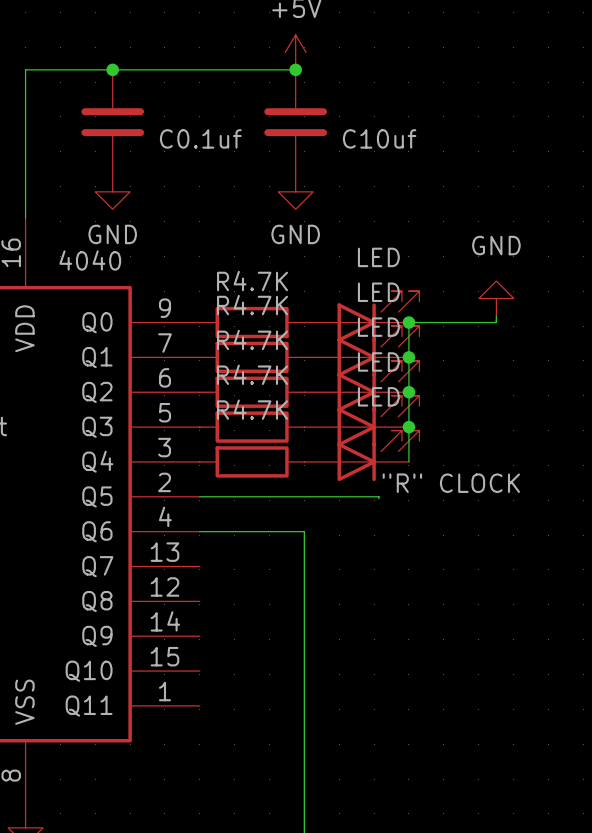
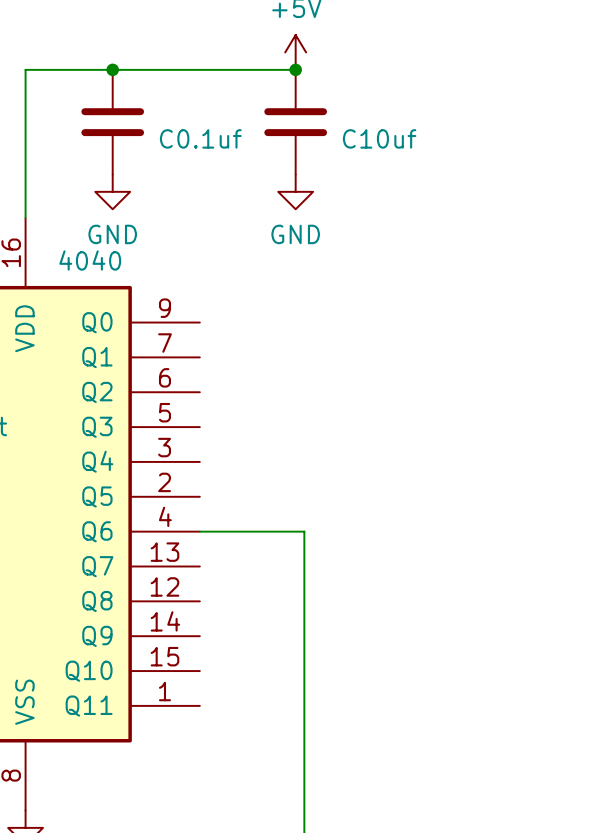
power symbol: GND (496, 298) -> none
wire: (496, 315) (496, 322) (408, 322) (408, 461) -> none
part: LED (361, 316) -> none
part: R4.7K (252, 322) -> none
junction: (408, 322) -> none
part: LED (361, 351) -> none
part: R4.7K (252, 357) -> none
junction: (408, 357) -> none
part: LED (361, 386) -> none
part: R4.7K (252, 392) -> none
junction: (408, 392) -> none
part: LED (361, 420) -> none
part: R4.7K (252, 427) -> none
junction: (408, 427) -> none
part: LED (361, 455) -> none
part: R4.7K (252, 461) -> none
label: "R" CLOCK (451, 483) -> none
wire: (199, 496) (379, 496) (379, 498) -> none

